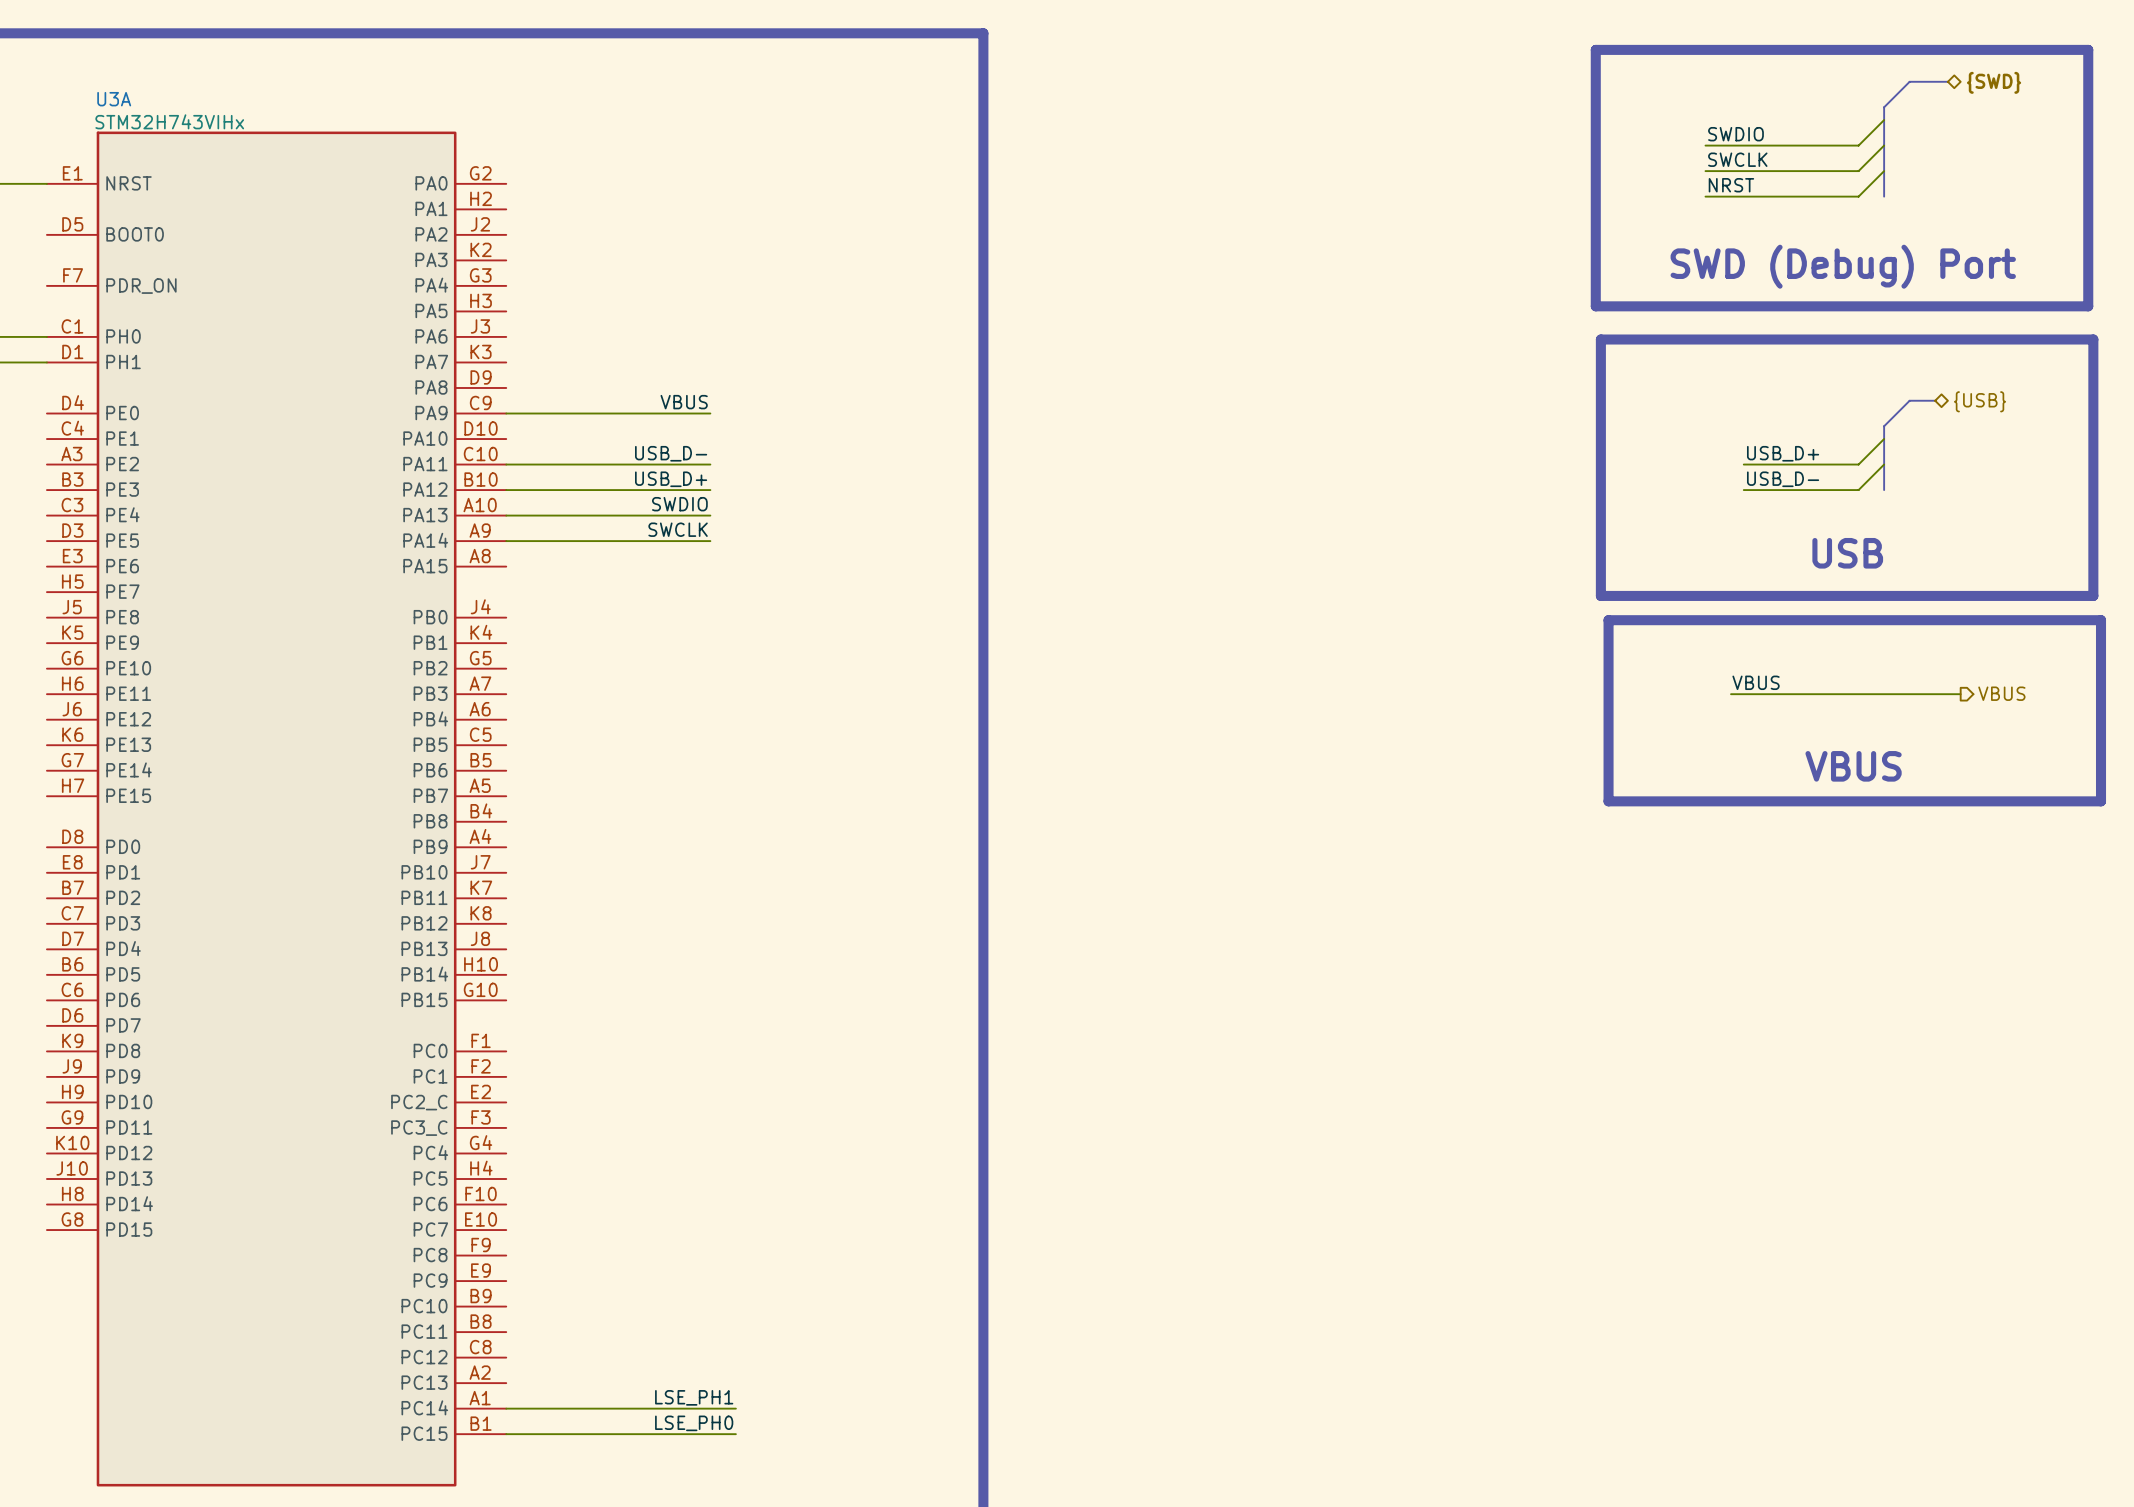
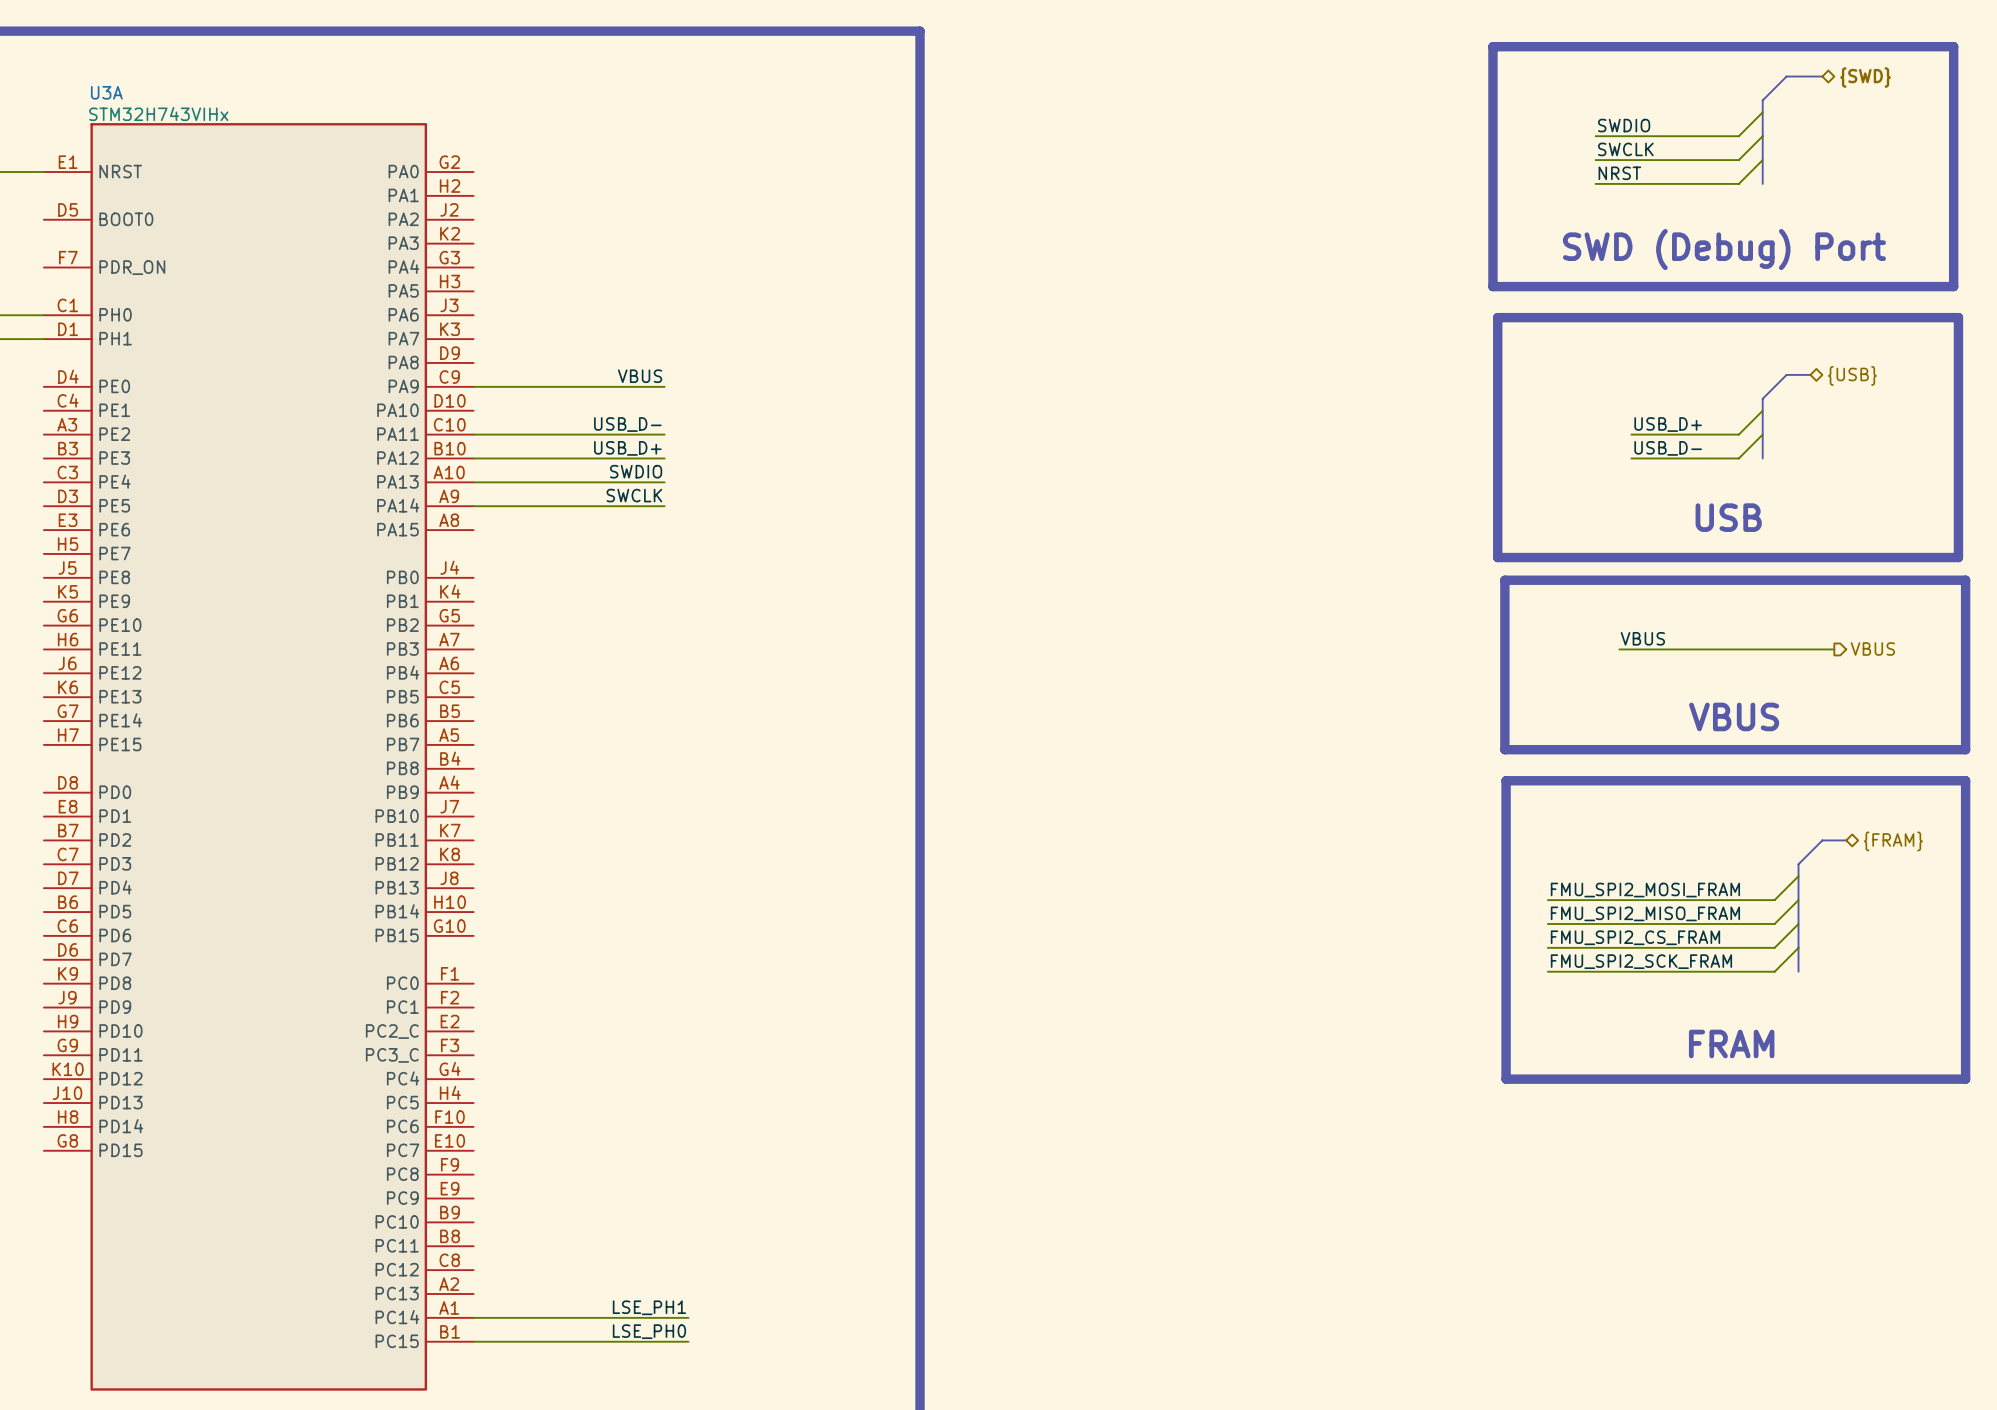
line: none -> (1506, 780) (1965, 780) (1965, 1079) (1506, 1079) (1506, 780)
bus: none -> (1846, 840) (1822, 840) (1798, 864) (1798, 971)
hierarchical label: none -> {FRAM} (1893, 841)
wire: none -> (1798, 876) (1774, 900) (1547, 900)
label: none -> FMU_SPI2_MOSI_FRAM (1645, 890)
wire: none -> (1798, 900) (1774, 923) (1547, 923)
label: none -> FMU_SPI2_MISO_FRAM (1645, 913)
wire: none -> (1798, 923) (1774, 947) (1547, 947)
label: none -> FMU_SPI2_CS_FRAM (1635, 937)
wire: none -> (1798, 947) (1774, 971) (1547, 971)
label: none -> FMU_SPI2_SCK_FRAM (1641, 961)
text: none -> FRAM (1731, 1044)

